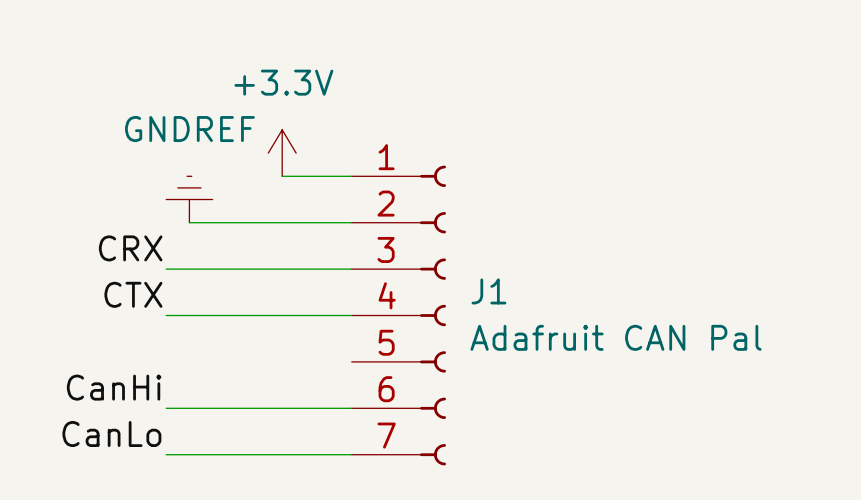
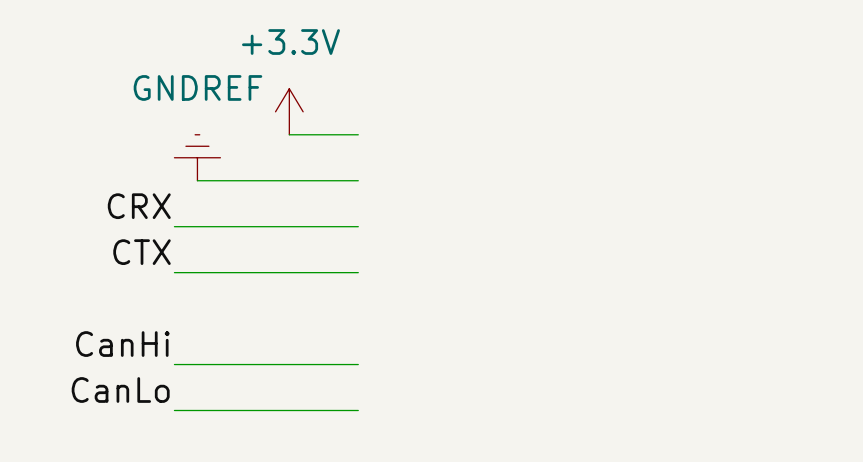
J1: Adafruit CAN Pal (398, 315) -> none

